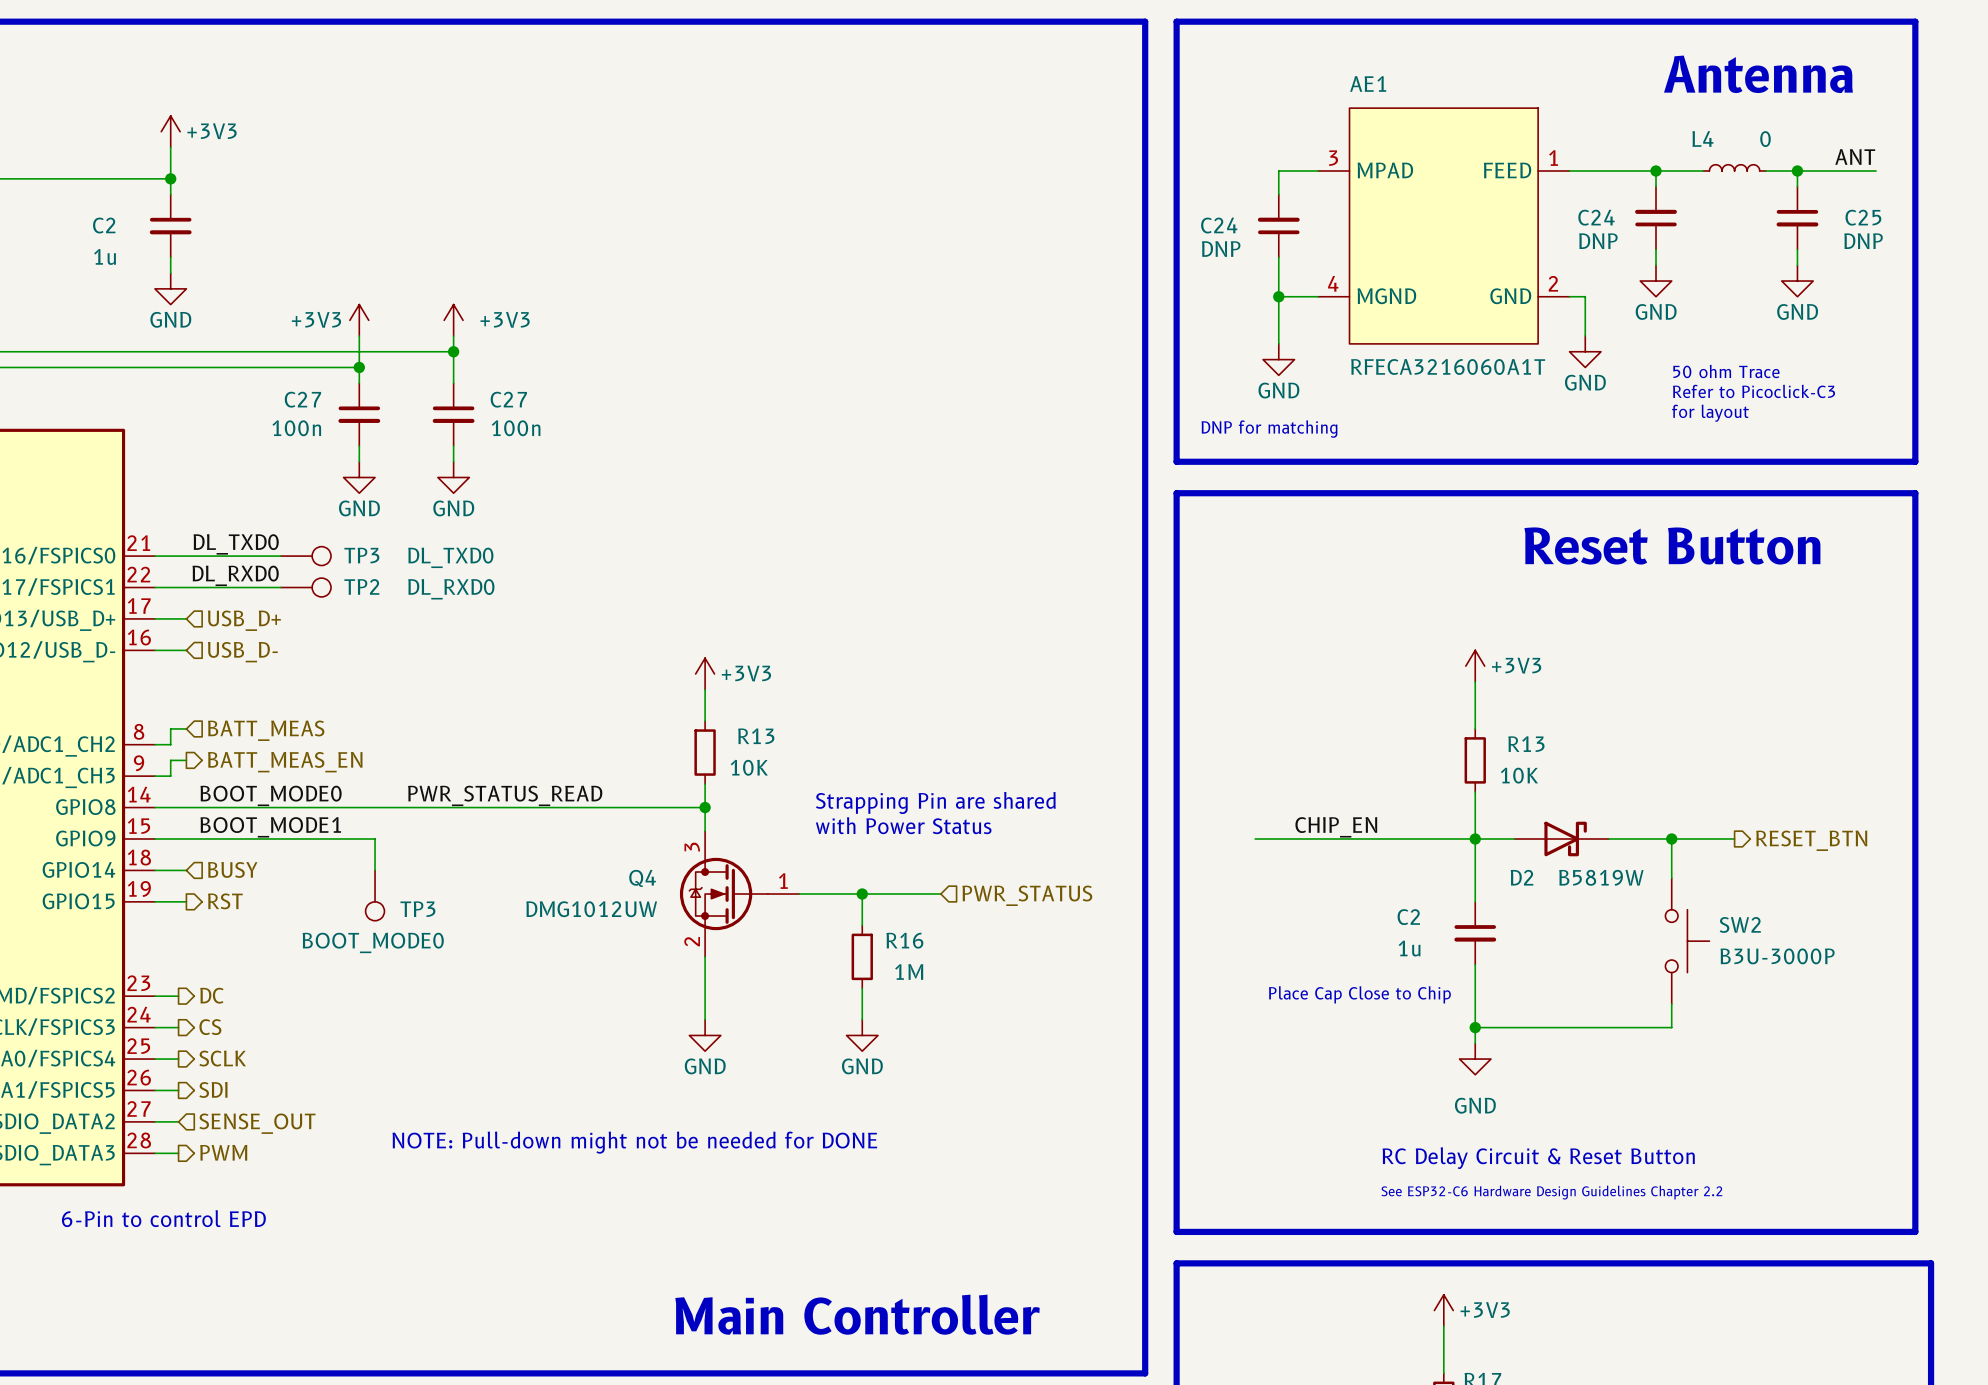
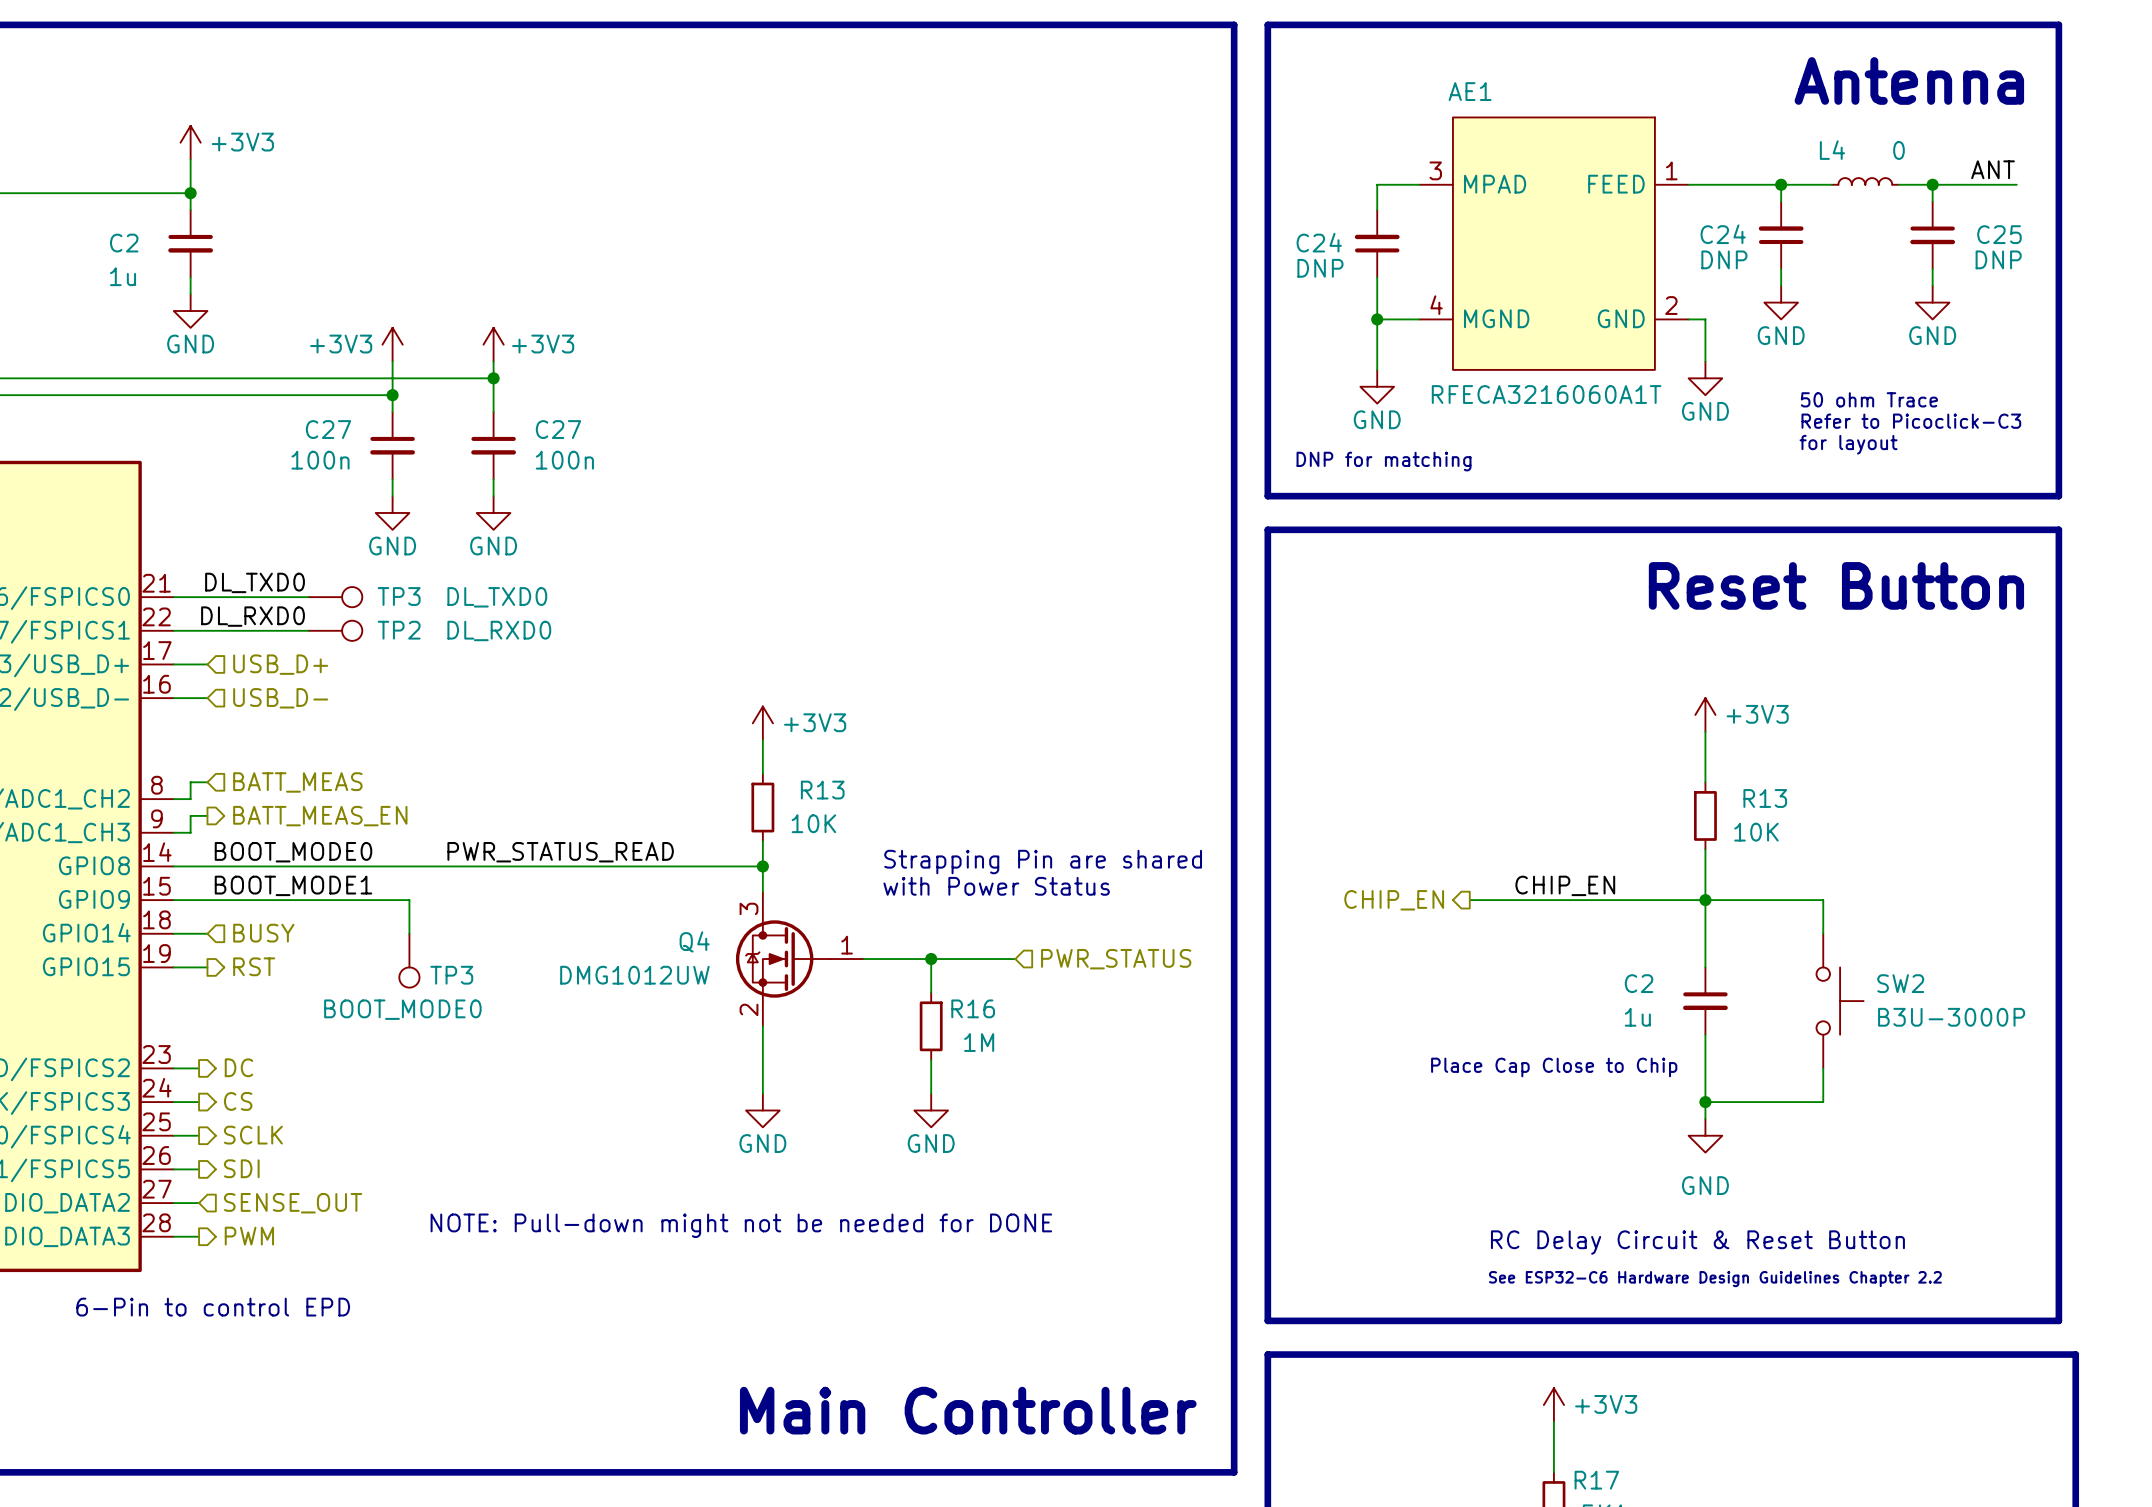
power symbol position: +3V3 (1475, 666) -> +3V3 (1705, 714)
wire: (1475, 681) (1475, 728) -> (1705, 731) (1705, 782)
R13 position: (1475, 760) -> (1705, 815)
wire: (1475, 791) (1475, 901) -> (1705, 849) (1705, 967)
label position: CHIP_EN (1336, 827) -> CHIP_EN (1565, 885)
wire: (1255, 838) (1365, 838) -> none
junction: (1475, 838) -> none
D2: B5819W (1561, 838) -> none
junction: none -> (1705, 900)
wire: (1671, 838) (1671, 878) -> none
junction: (1671, 838) -> none
wire: (1695, 838) (1734, 838) -> (1823, 900) (1823, 933)
hierarchical label: none -> CHIP_EN (1394, 900)
hierarchical label: RESET_BTN (1811, 840) -> none
C2 position: (1475, 933) -> (1705, 1001)
SW2 position: (1687, 941) -> (1840, 1001)
wire: (1475, 964) (1475, 1043) -> (1705, 1034) (1705, 1118)
text position: Place Cap Close to Chip (1359, 994) -> Place Cap Close to Chip (1554, 1067)
wire: (1671, 1004) (1671, 1027) -> (1823, 1068) (1823, 1102) (1798, 1102)
wire: (1475, 1027) (1585, 1027) -> none
junction: (1475, 1027) -> none
junction: none -> (1705, 1102)
power symbol position: GND (1475, 1059) -> GND (1705, 1135)

